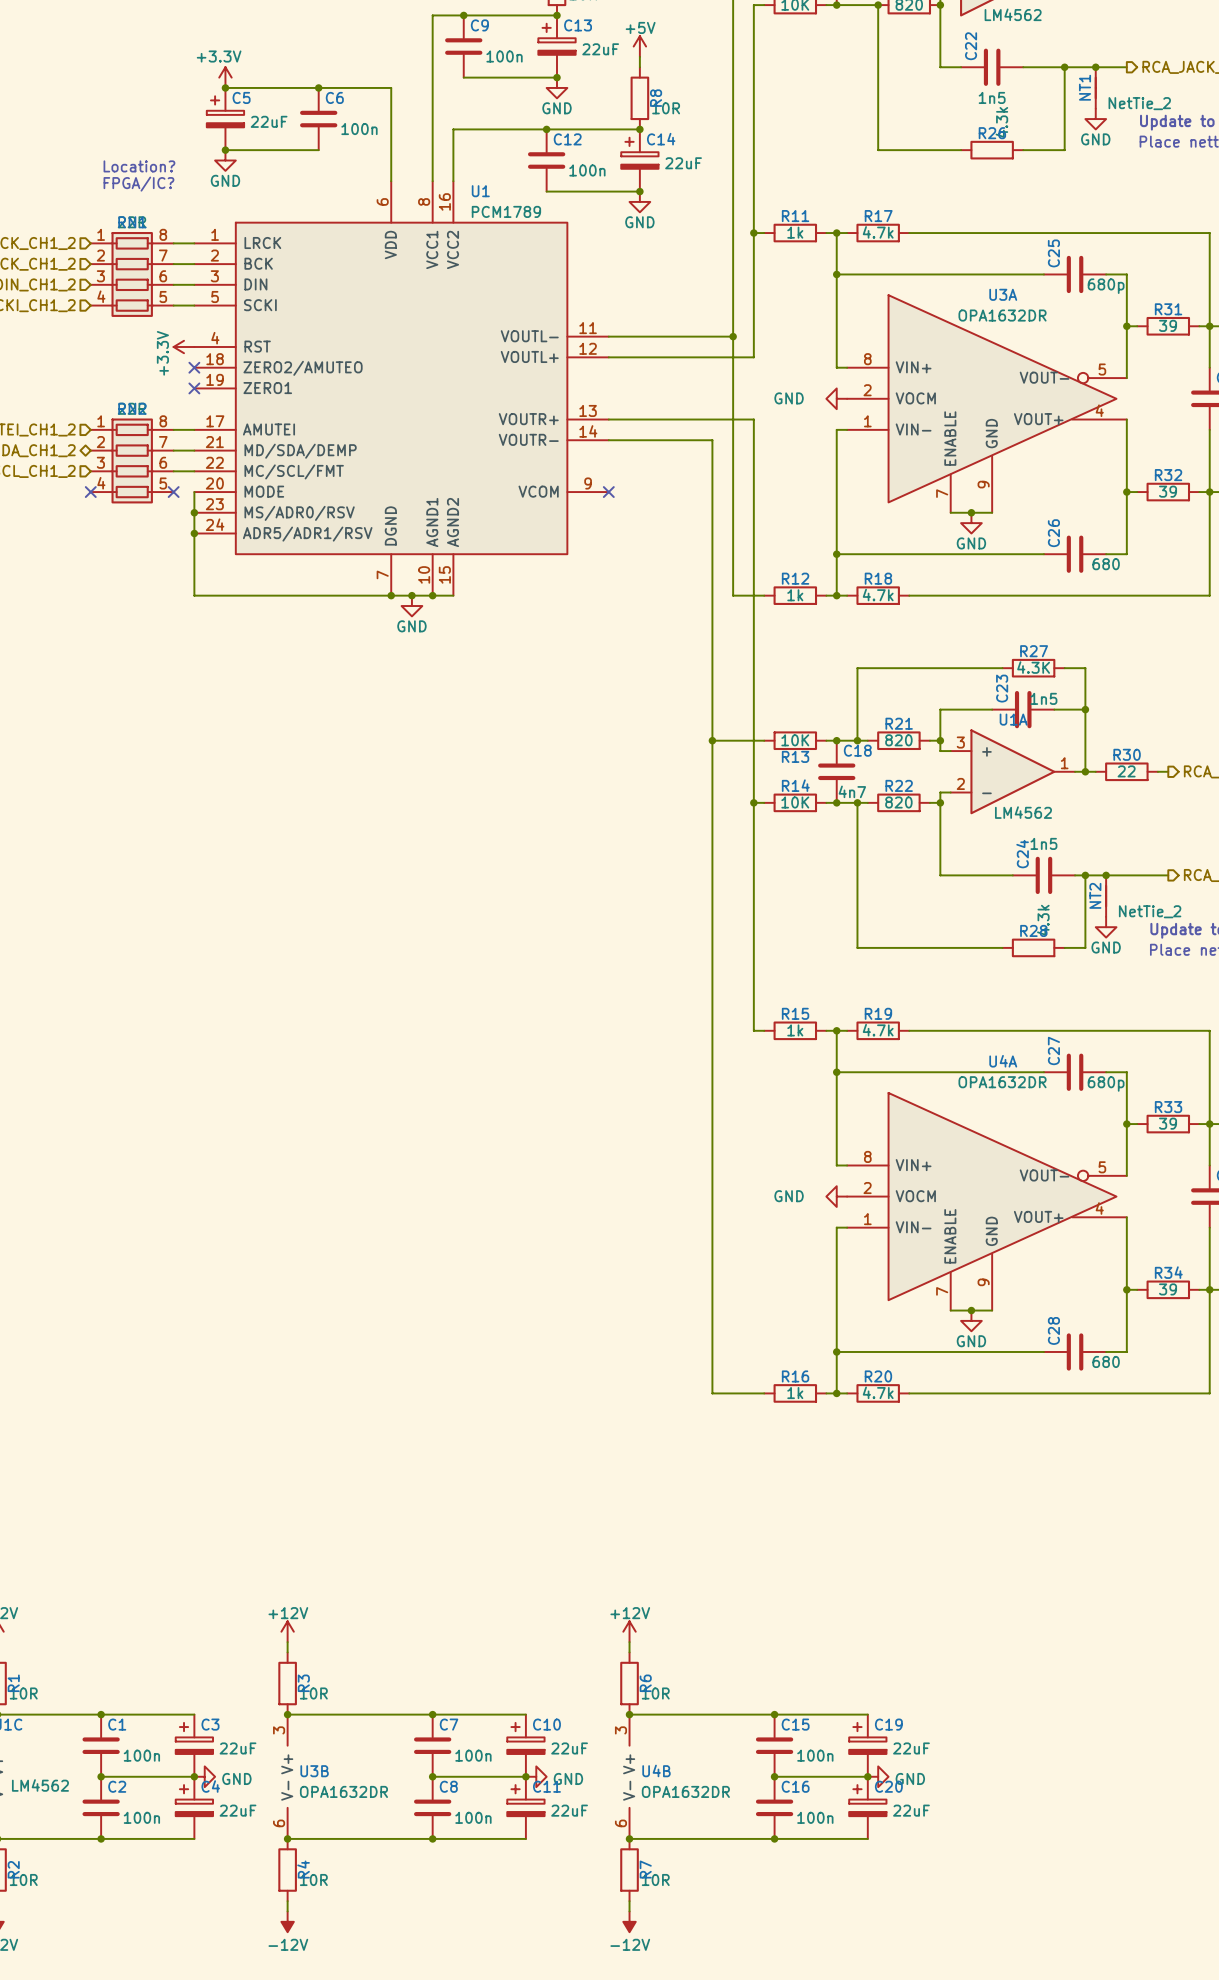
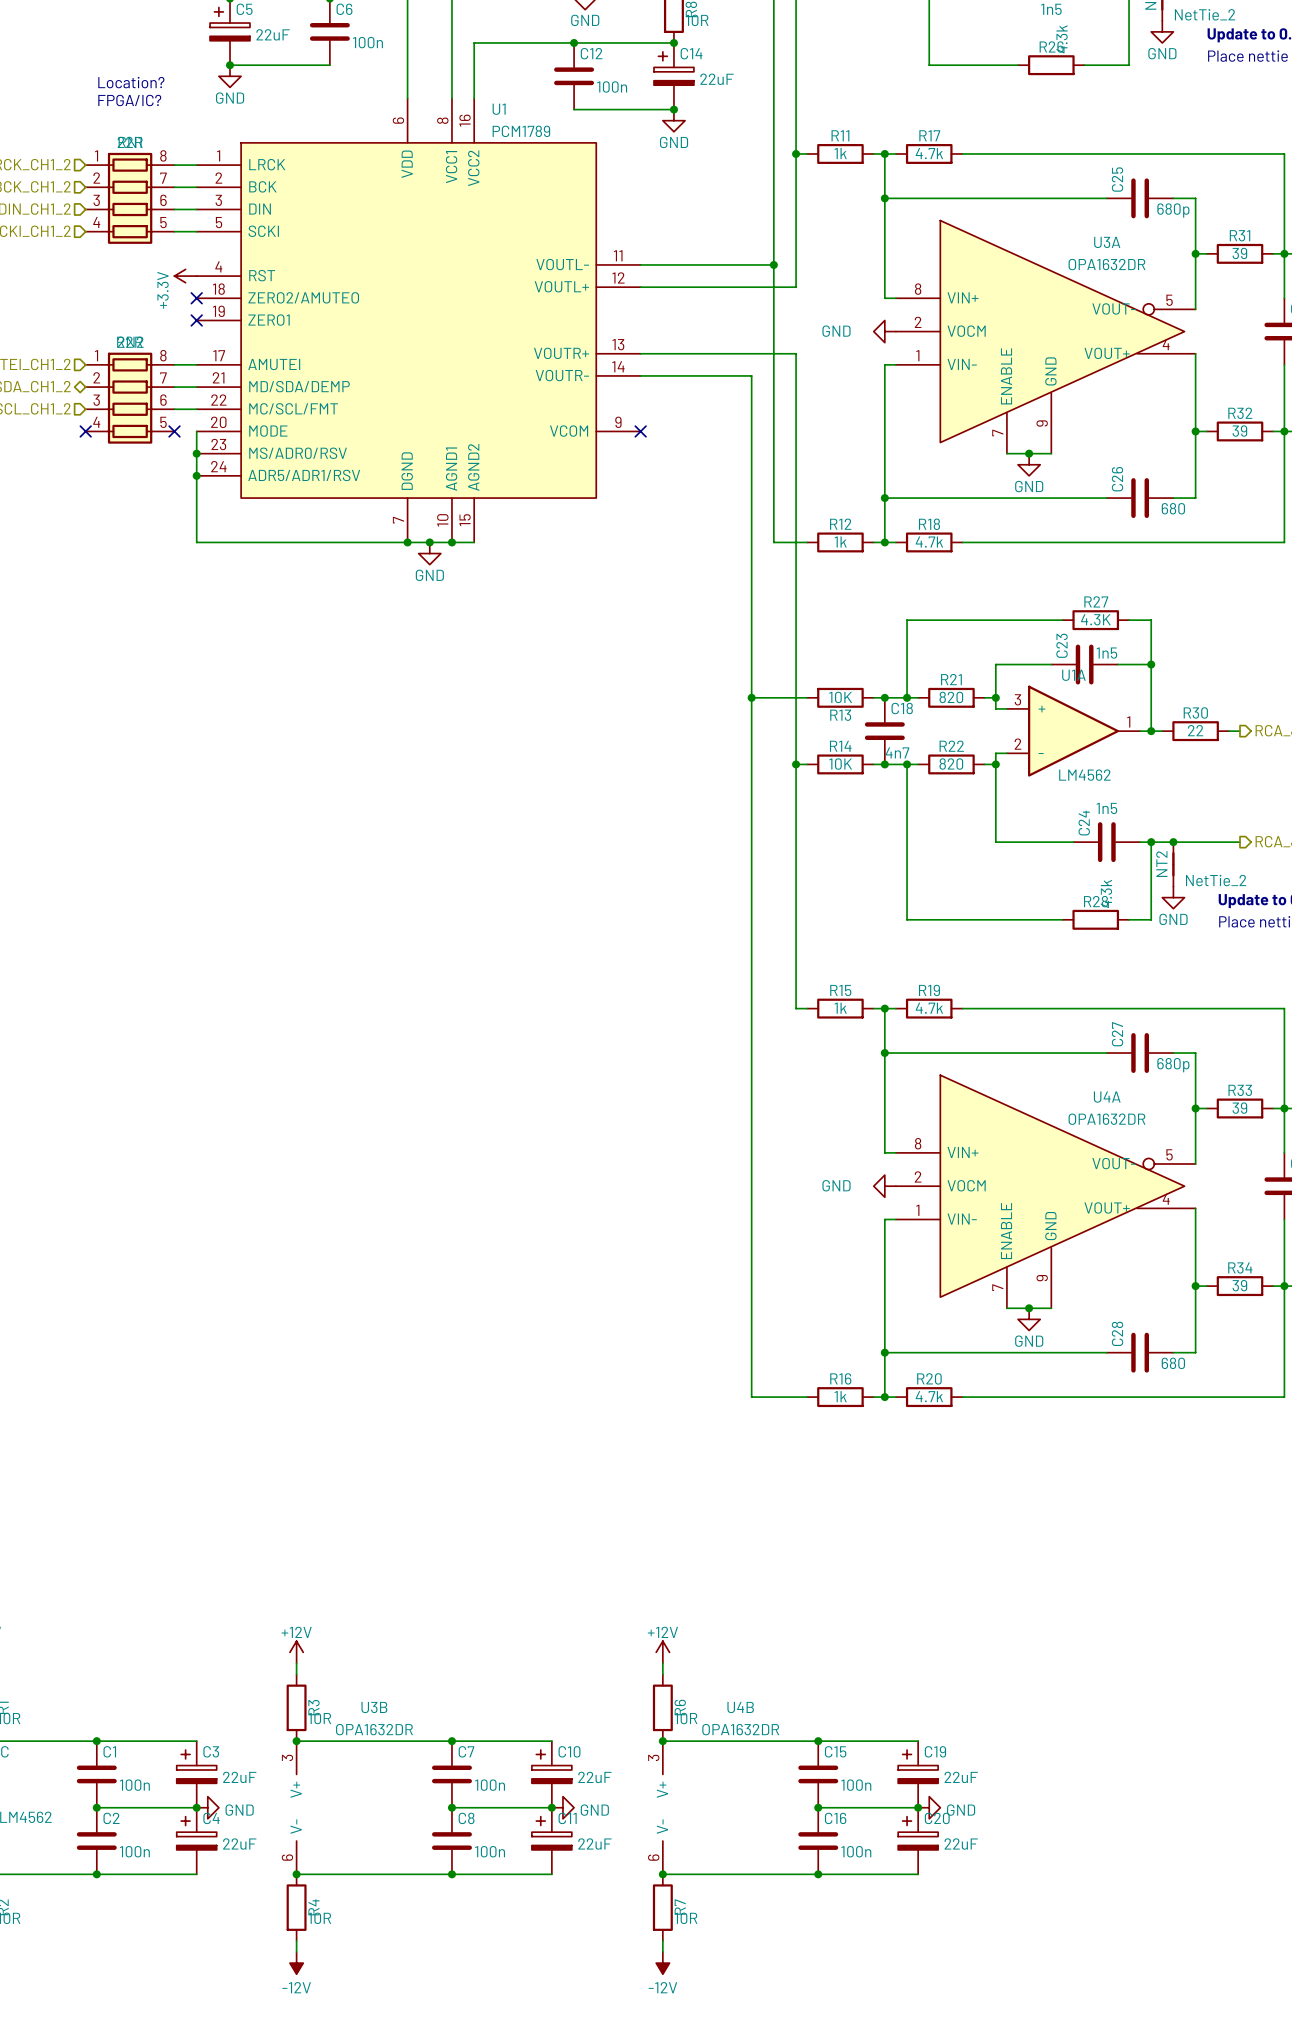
U3A name position: U3A (1003, 294) -> U3A (1107, 242)
U3A value position: OPA1632DR (1002, 315) -> OPA1632DR (1107, 264)
U4A name position: U4A (1003, 1061) -> U4A (1107, 1097)
U4A value position: OPA1632DR (1002, 1082) -> OPA1632DR (1107, 1119)
U4B name position: U4B (656, 1770) -> U4B (740, 1707)
U3B name position: U3B (314, 1771) -> U3B (374, 1707)
U3B value position: OPA1632DR (343, 1791) -> OPA1632DR (374, 1729)
U4B value position: OPA1632DR (685, 1791) -> OPA1632DR (740, 1729)

